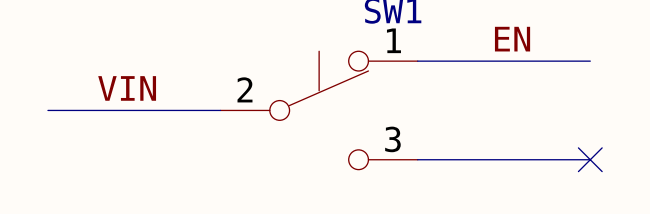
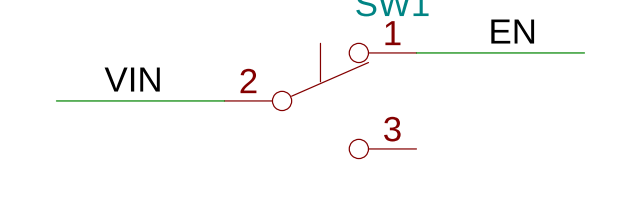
wire: (417, 159) (590, 159) -> none
no-connect mark: (590, 159) -> none

